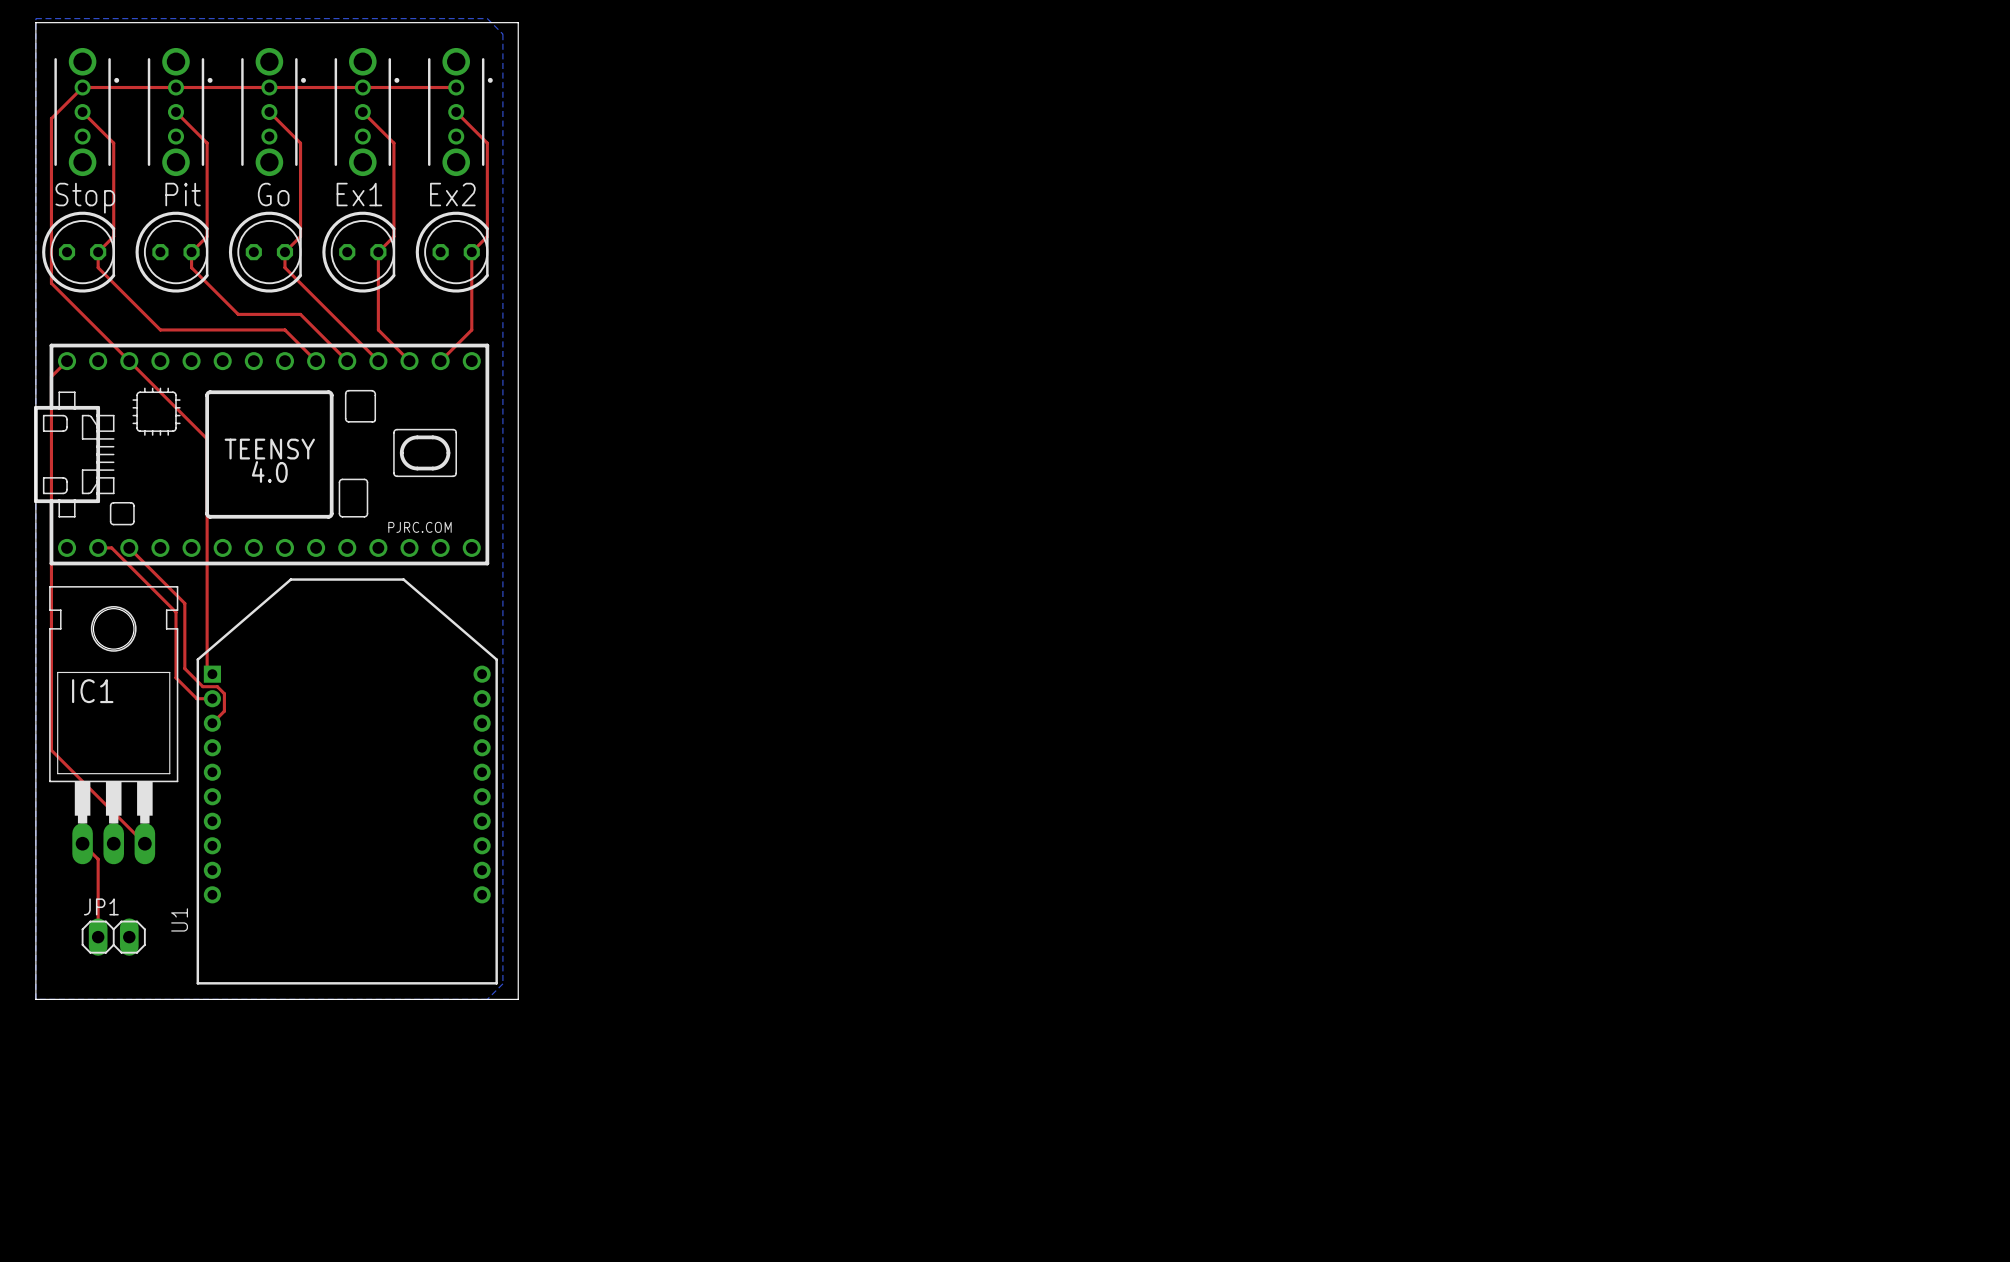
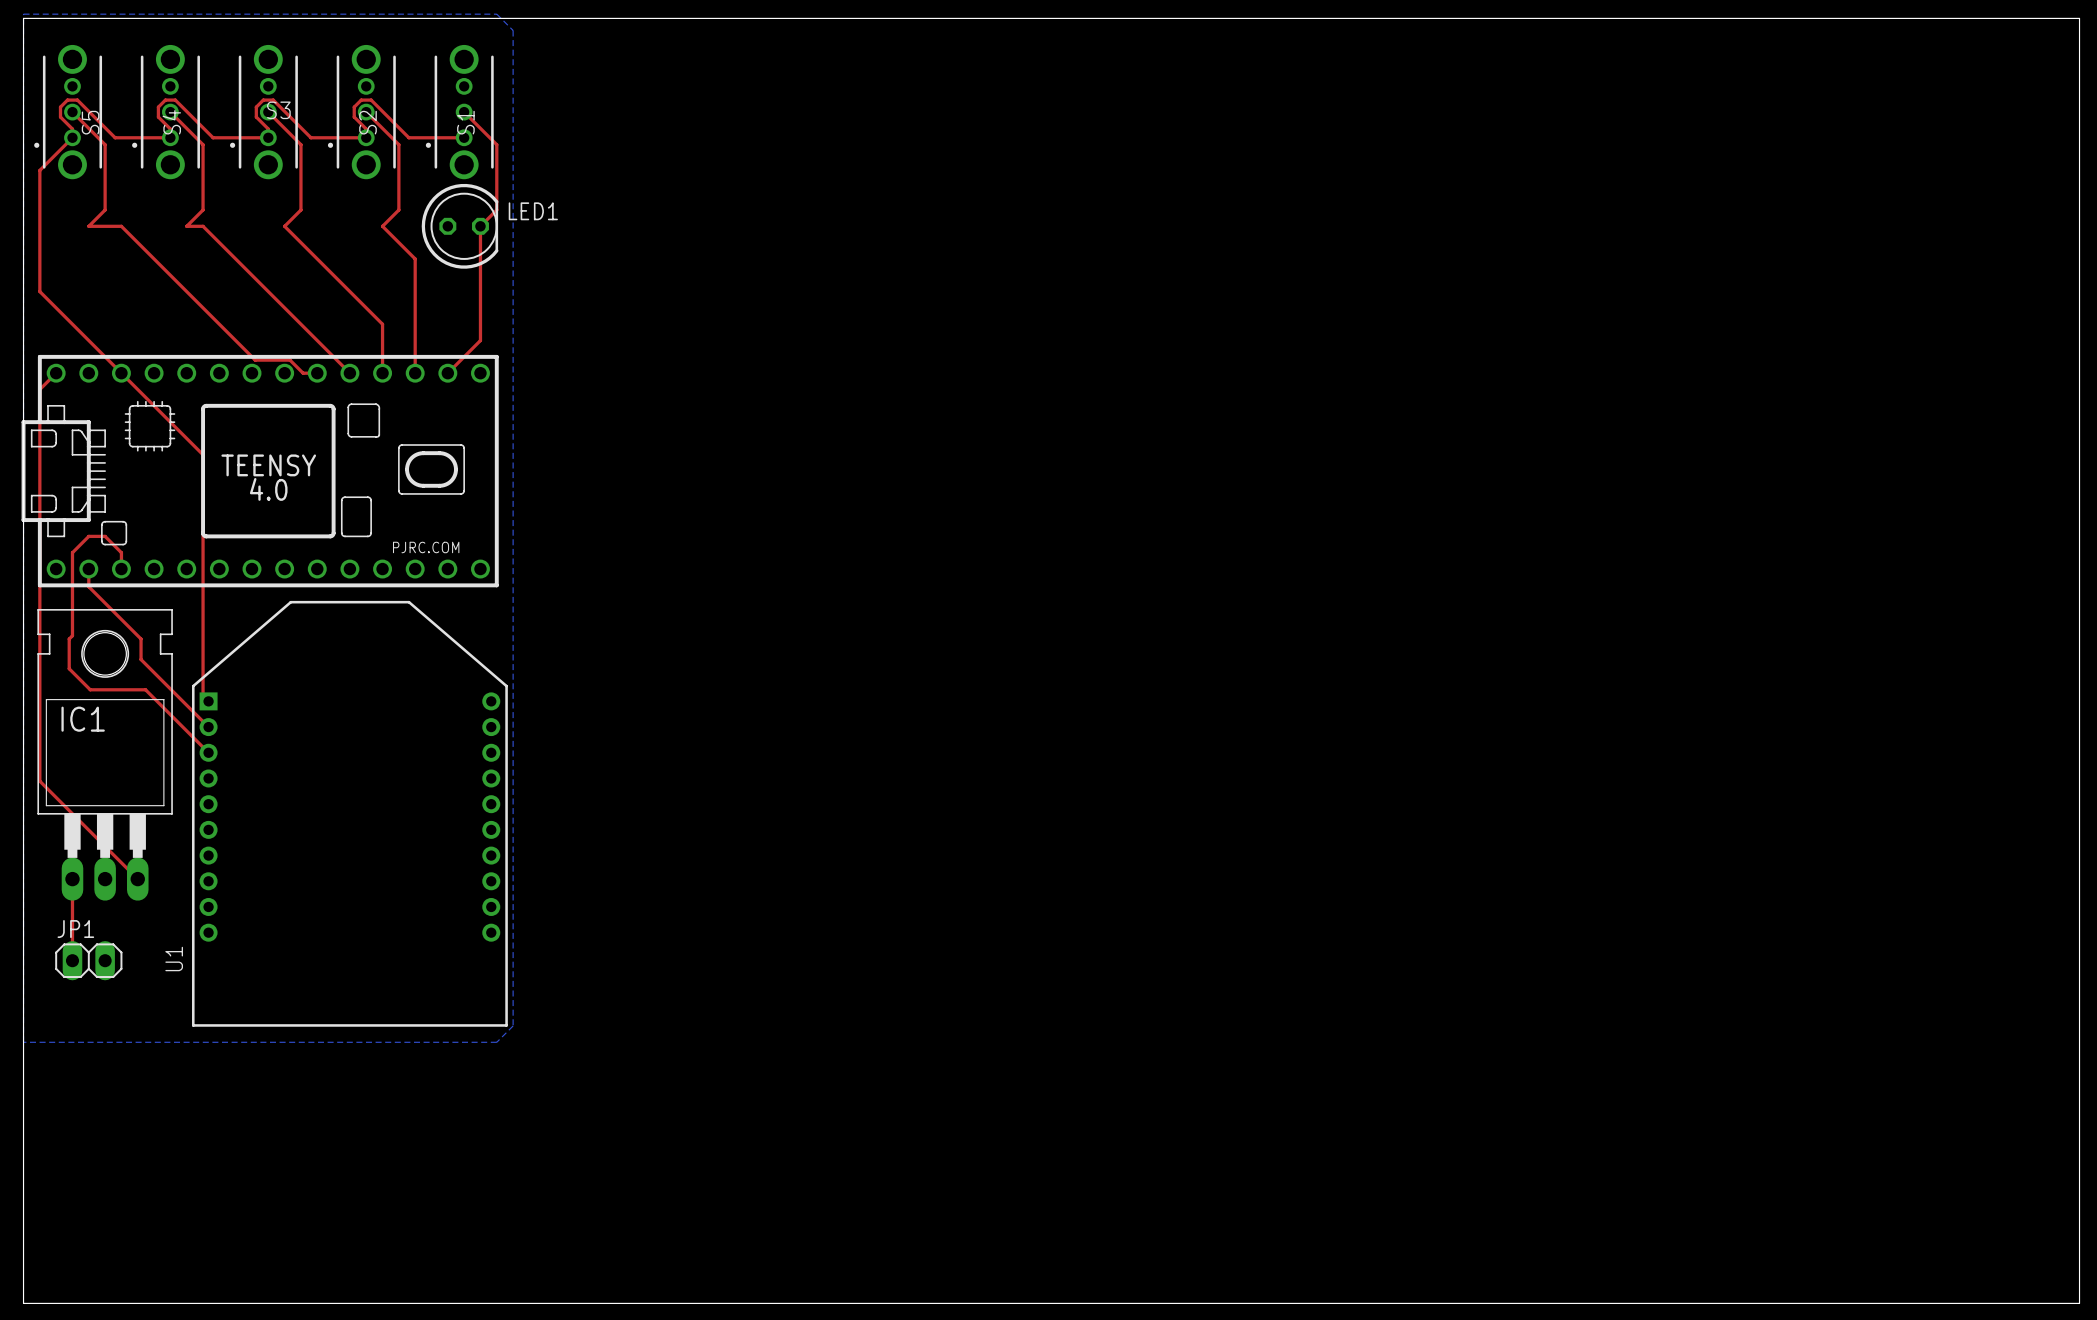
board edge: (518, 22) (518, 999) (35, 999) -> (529, 18) (2079, 18) (2079, 1303) (23, 1303) (23, 1042)
top track: (456, 87) (82, 87) (51, 118) (51, 167) -> (464, 137) (408, 137) (371, 100) (361, 100) (354, 107) (354, 117) (366, 129) (366, 137) (310, 137) (273, 100) (263, 100) (256, 107) (256, 117) (268, 129) (268, 137) (213, 137) (175, 100) (165, 100) (158, 107) (158, 117) (170, 129) (170, 137) (115, 137) (77, 100) (67, 100) (60, 107) (60, 117) (72, 129) (72, 137) (39, 170)
S5: none -> (68, 112)
part: (86, 112) -> none
S4: none -> (166, 112)
part: (180, 112) -> none
S3: none -> (263, 112)
part: (273, 112) -> none
S2: none -> (361, 112)
part: (366, 112) -> none
S1: none -> (459, 112)
part: (460, 112) -> none
text: Pit (183, 194) -> none
text: Go (273, 194) -> none
text: Ex1 (359, 194) -> none
text: Ex2 (452, 194) -> none
text: Stop (85, 198) -> none
top track: (113, 205) (113, 236) (98, 252) (98, 267) (160, 329) (284, 329) (316, 361) -> (105, 210) (88, 226) (121, 226) (255, 360) (290, 360) (303, 373) (317, 373)
top track: (207, 205) (207, 236) (191, 252) (191, 267) (238, 314) (300, 314) -> (203, 210) (186, 226) (203, 226) (300, 324)
top track: (300, 205) (300, 236) (284, 252) (284, 267) (378, 361) -> (300, 210) (284, 226) (382, 324)
top track: (393, 205) (393, 236) (378, 252) (378, 314) -> (398, 210) (382, 226) (415, 258) (415, 373)
top track: (487, 205) (487, 236) (471, 252) -> (496, 210) (480, 226) (480, 258)
LED1: none -> (460, 226)
part: (78, 252) -> none
part: (172, 252) -> none
part: (265, 252) -> none
part: (358, 252) -> none
part: (452, 252) -> none
top track: (378, 329) (409, 361) -> (382, 340) (382, 373)
top track: (98, 547) (111, 547) (176, 612) (176, 677) (196, 698) (212, 698) -> (88, 569) (88, 586) (141, 639) (141, 659) (208, 727)
top track: (129, 547) (184, 603) (184, 668) (202, 686) (217, 686) (224, 693) (224, 711) (212, 723) -> (121, 569) (121, 552) (105, 536) (88, 536) (72, 552) (72, 635) (69, 639) (69, 668) (90, 689) (145, 689) (208, 752)
top track: (82, 843) (98, 859) (98, 937) -> (72, 879) (72, 960)
JP1 position: (113, 937) -> (88, 960)

